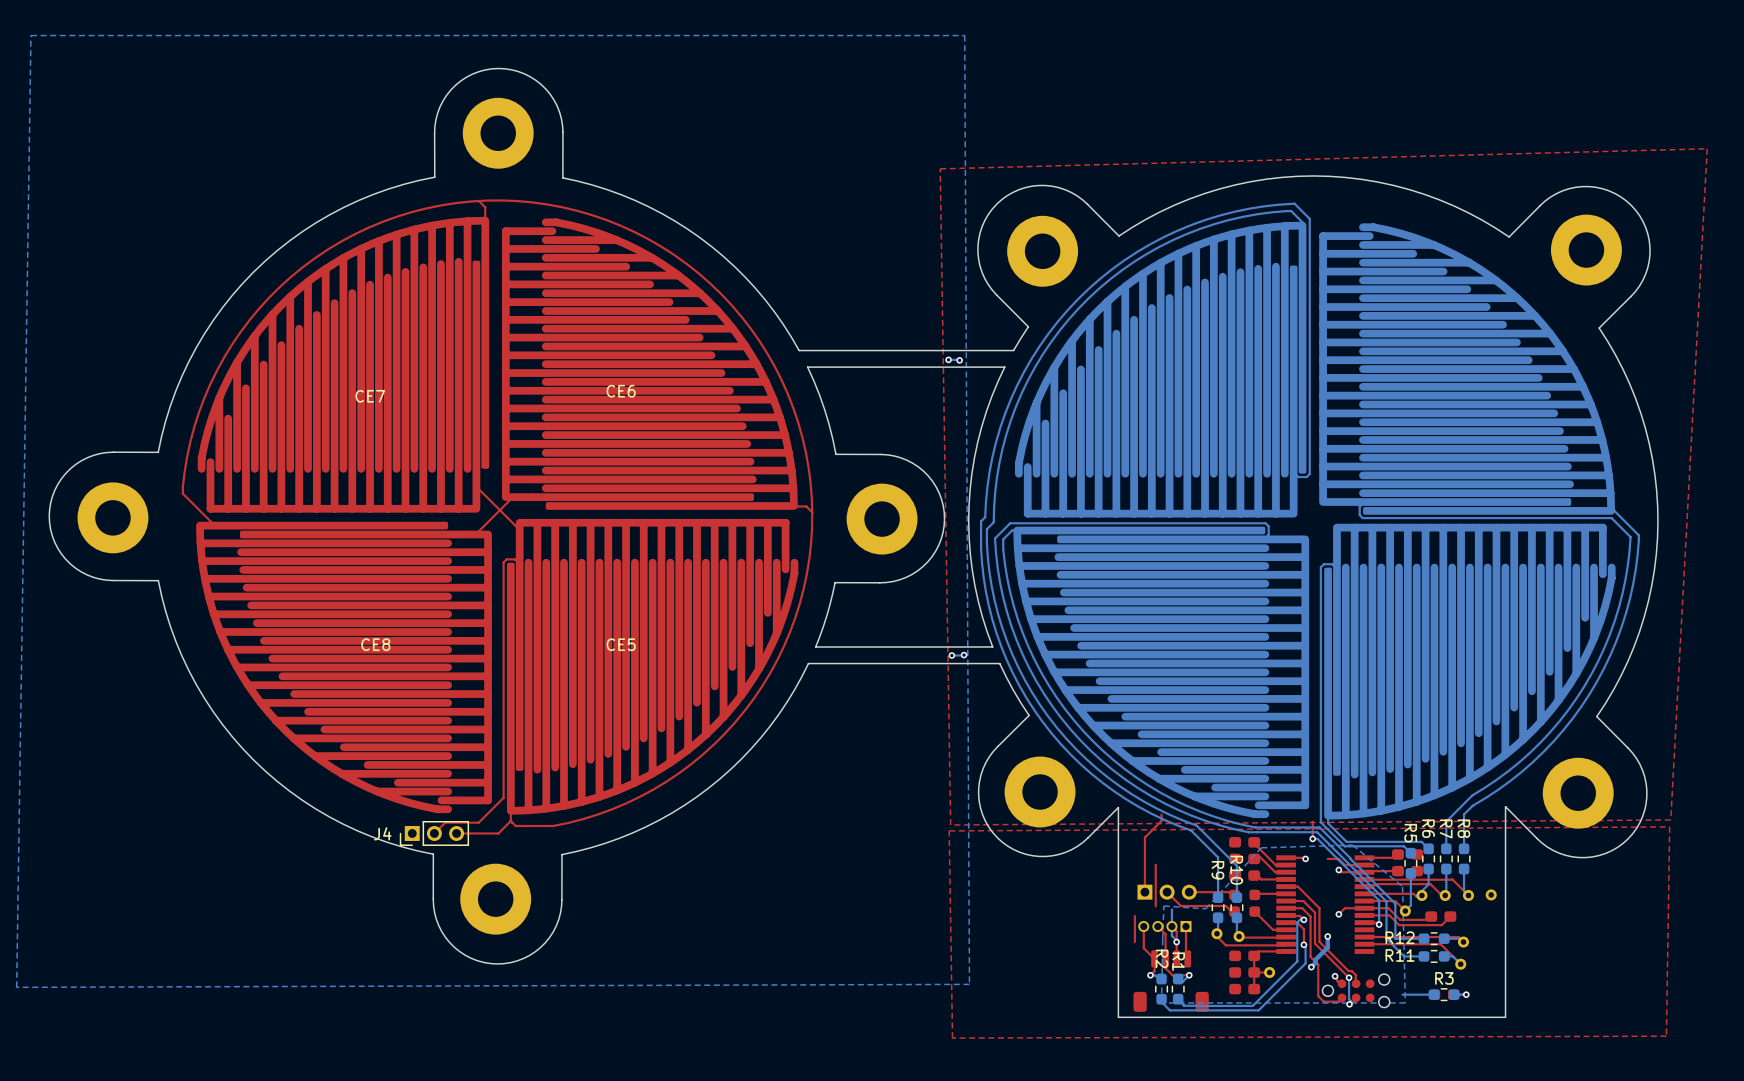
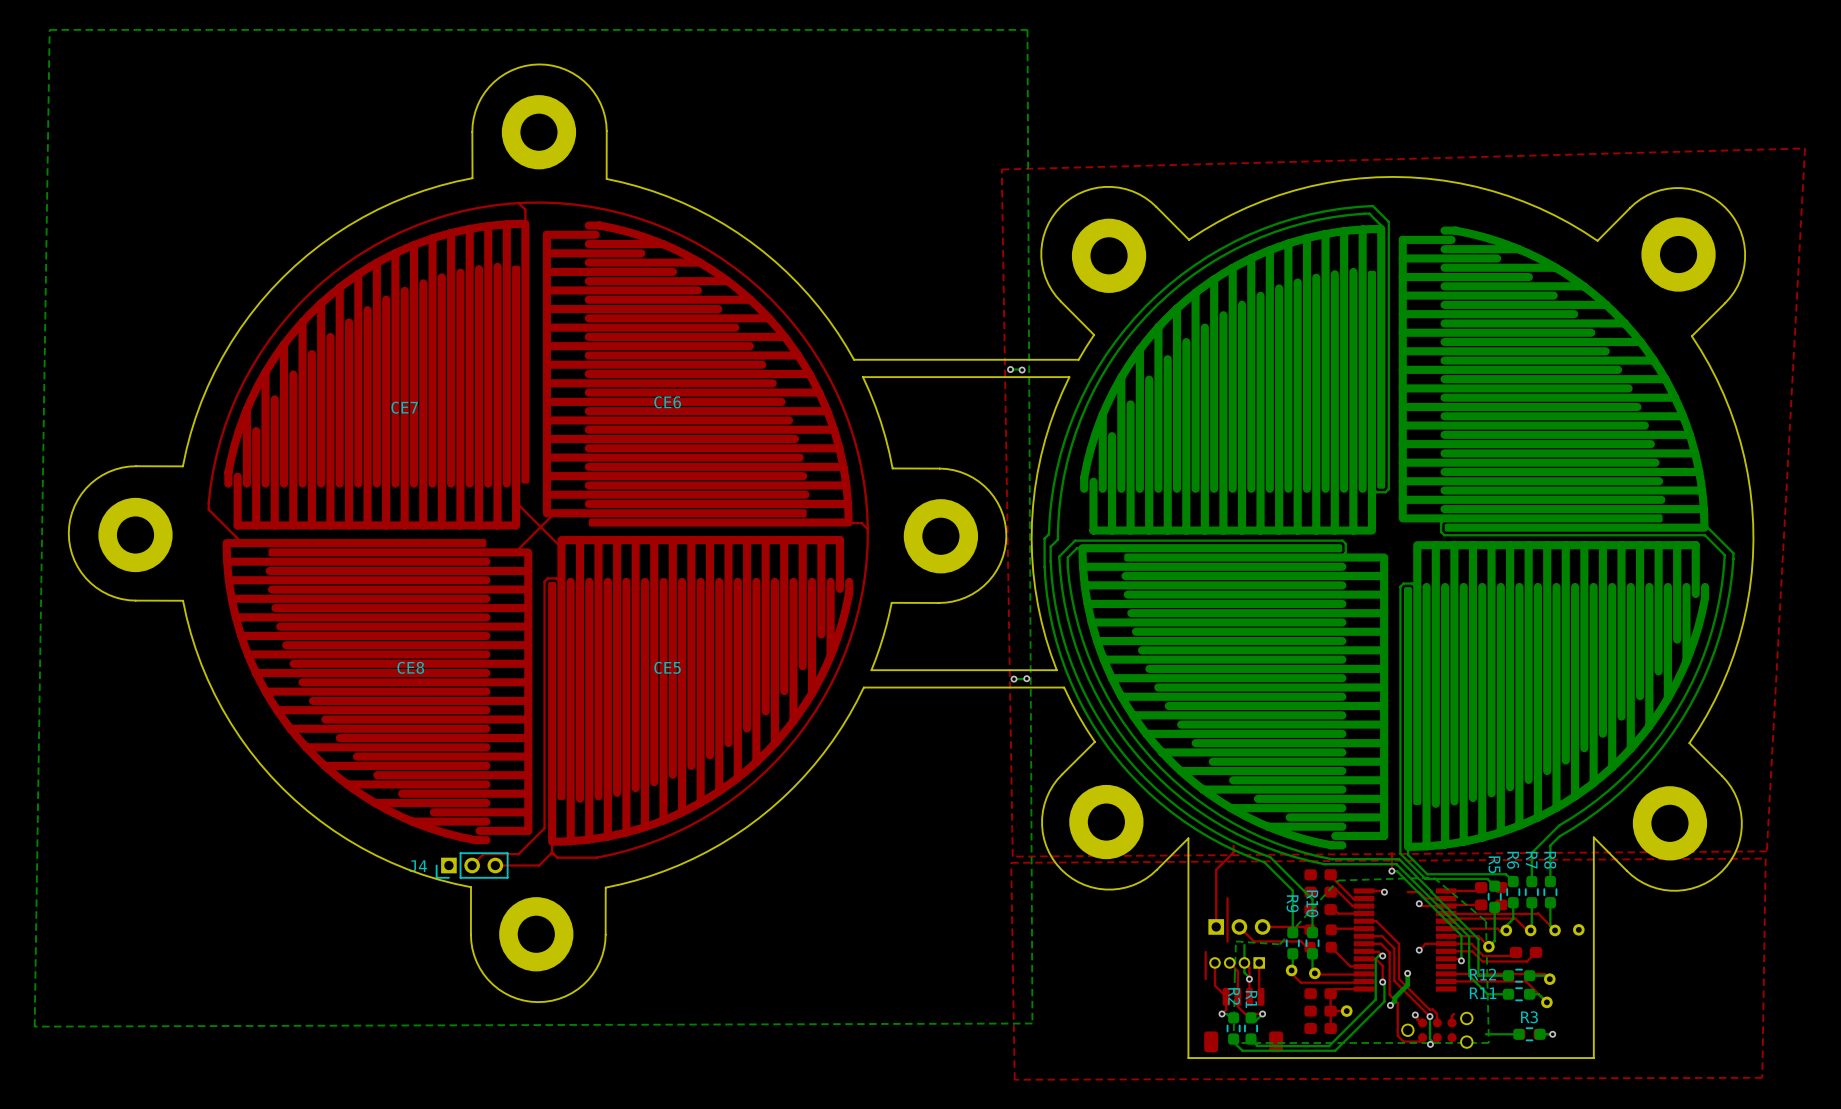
top track: none -> (1454, 1013) (1451, 1016) (1451, 1024)

